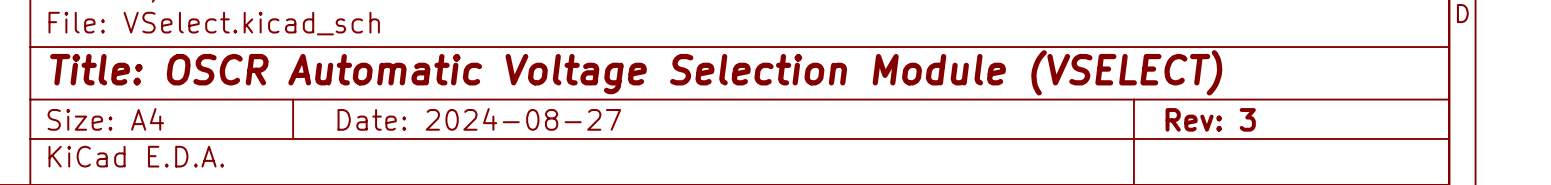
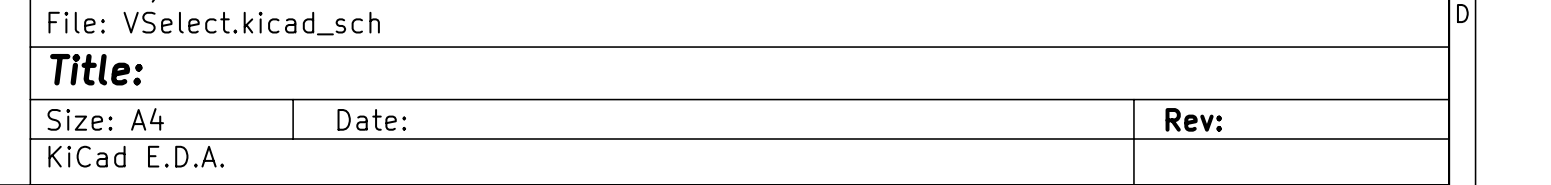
title block: Title: OSCR Automatic Voltage Selection Module (VSELECT) (636, 72) -> Title: (96, 69)
title block: Date: 2024-08-27 (479, 119) -> Date: (371, 119)
title block: Rev: 3 (1210, 119) -> Rev: (1193, 119)

